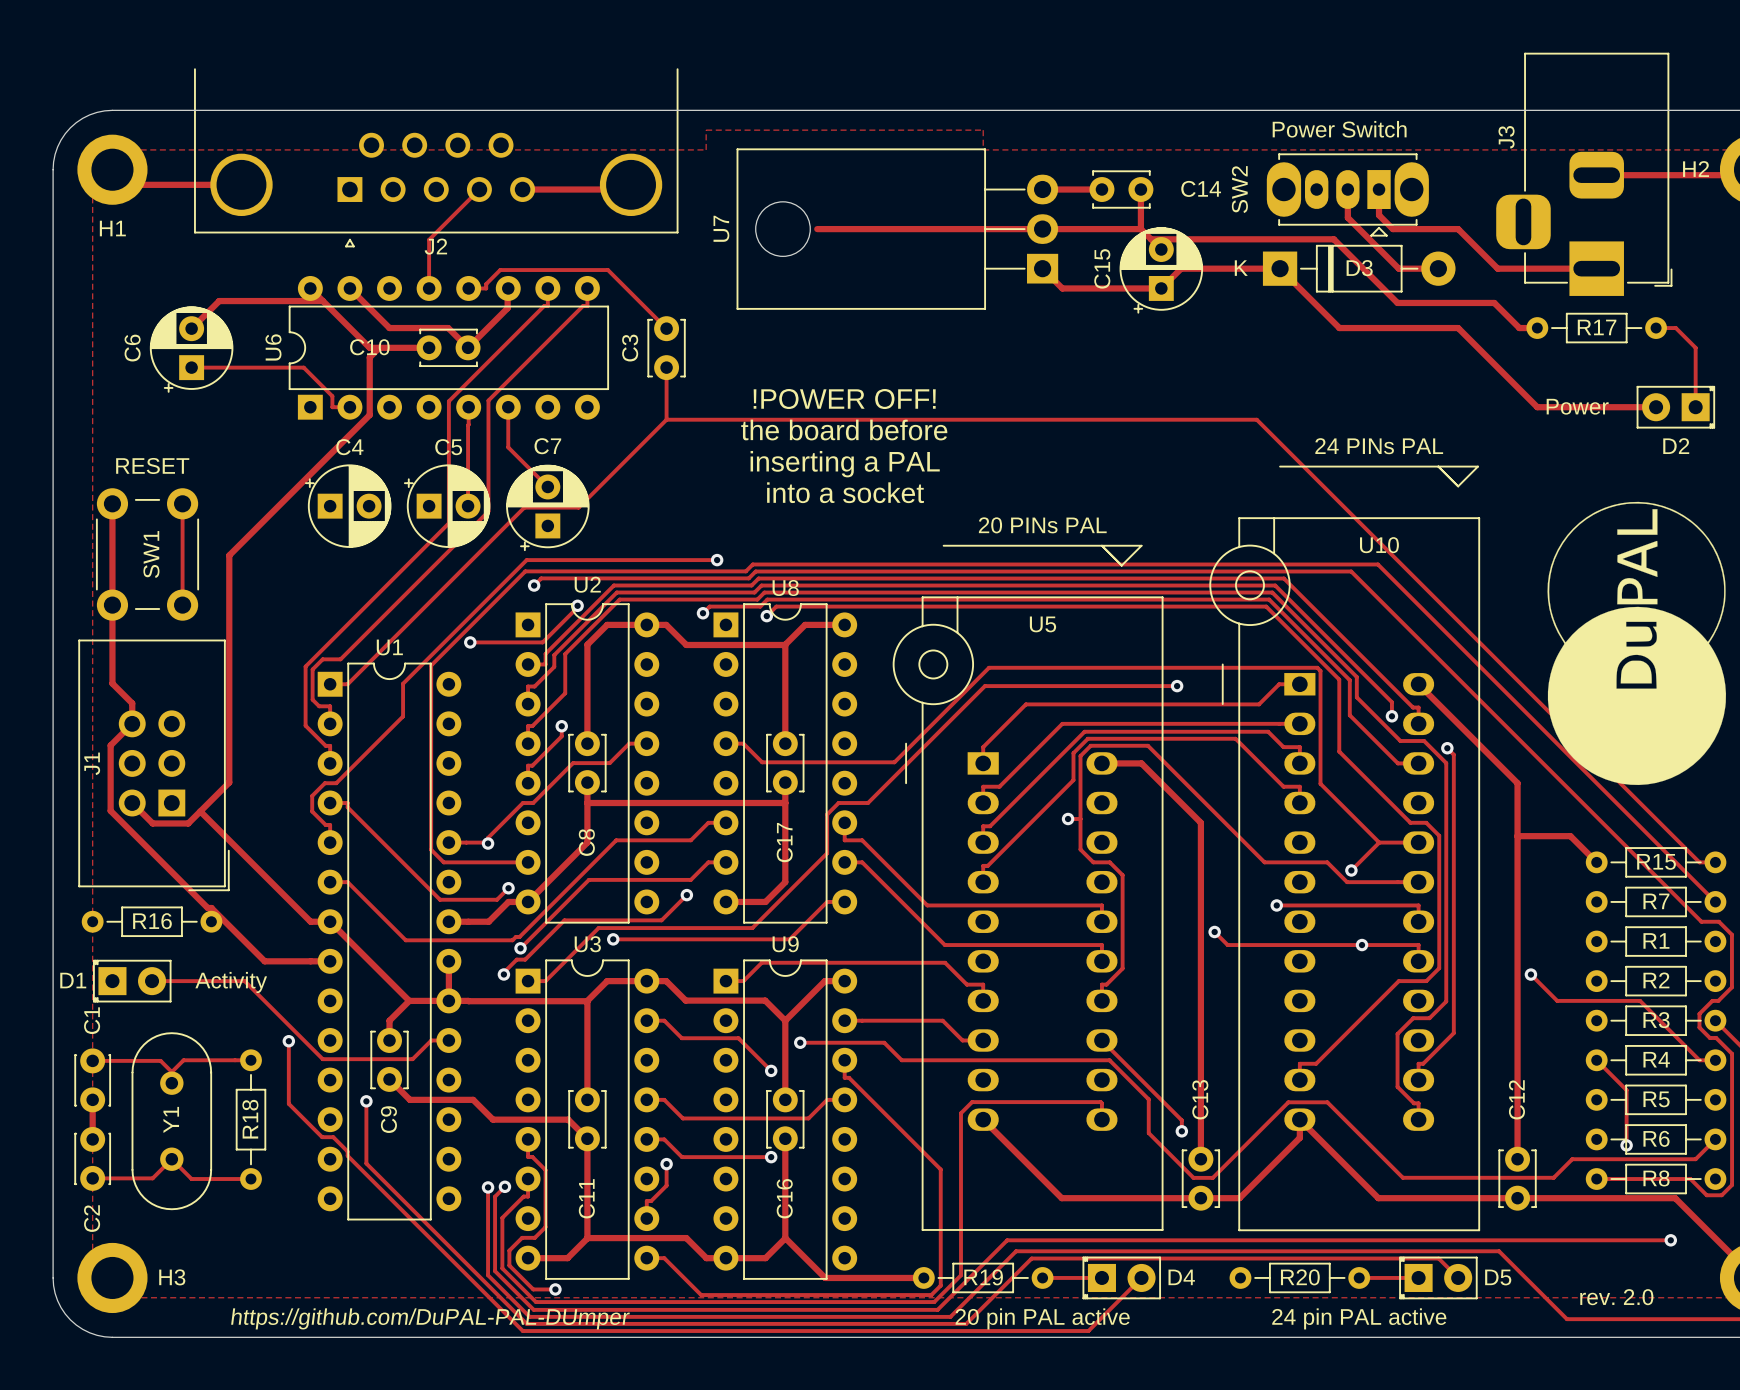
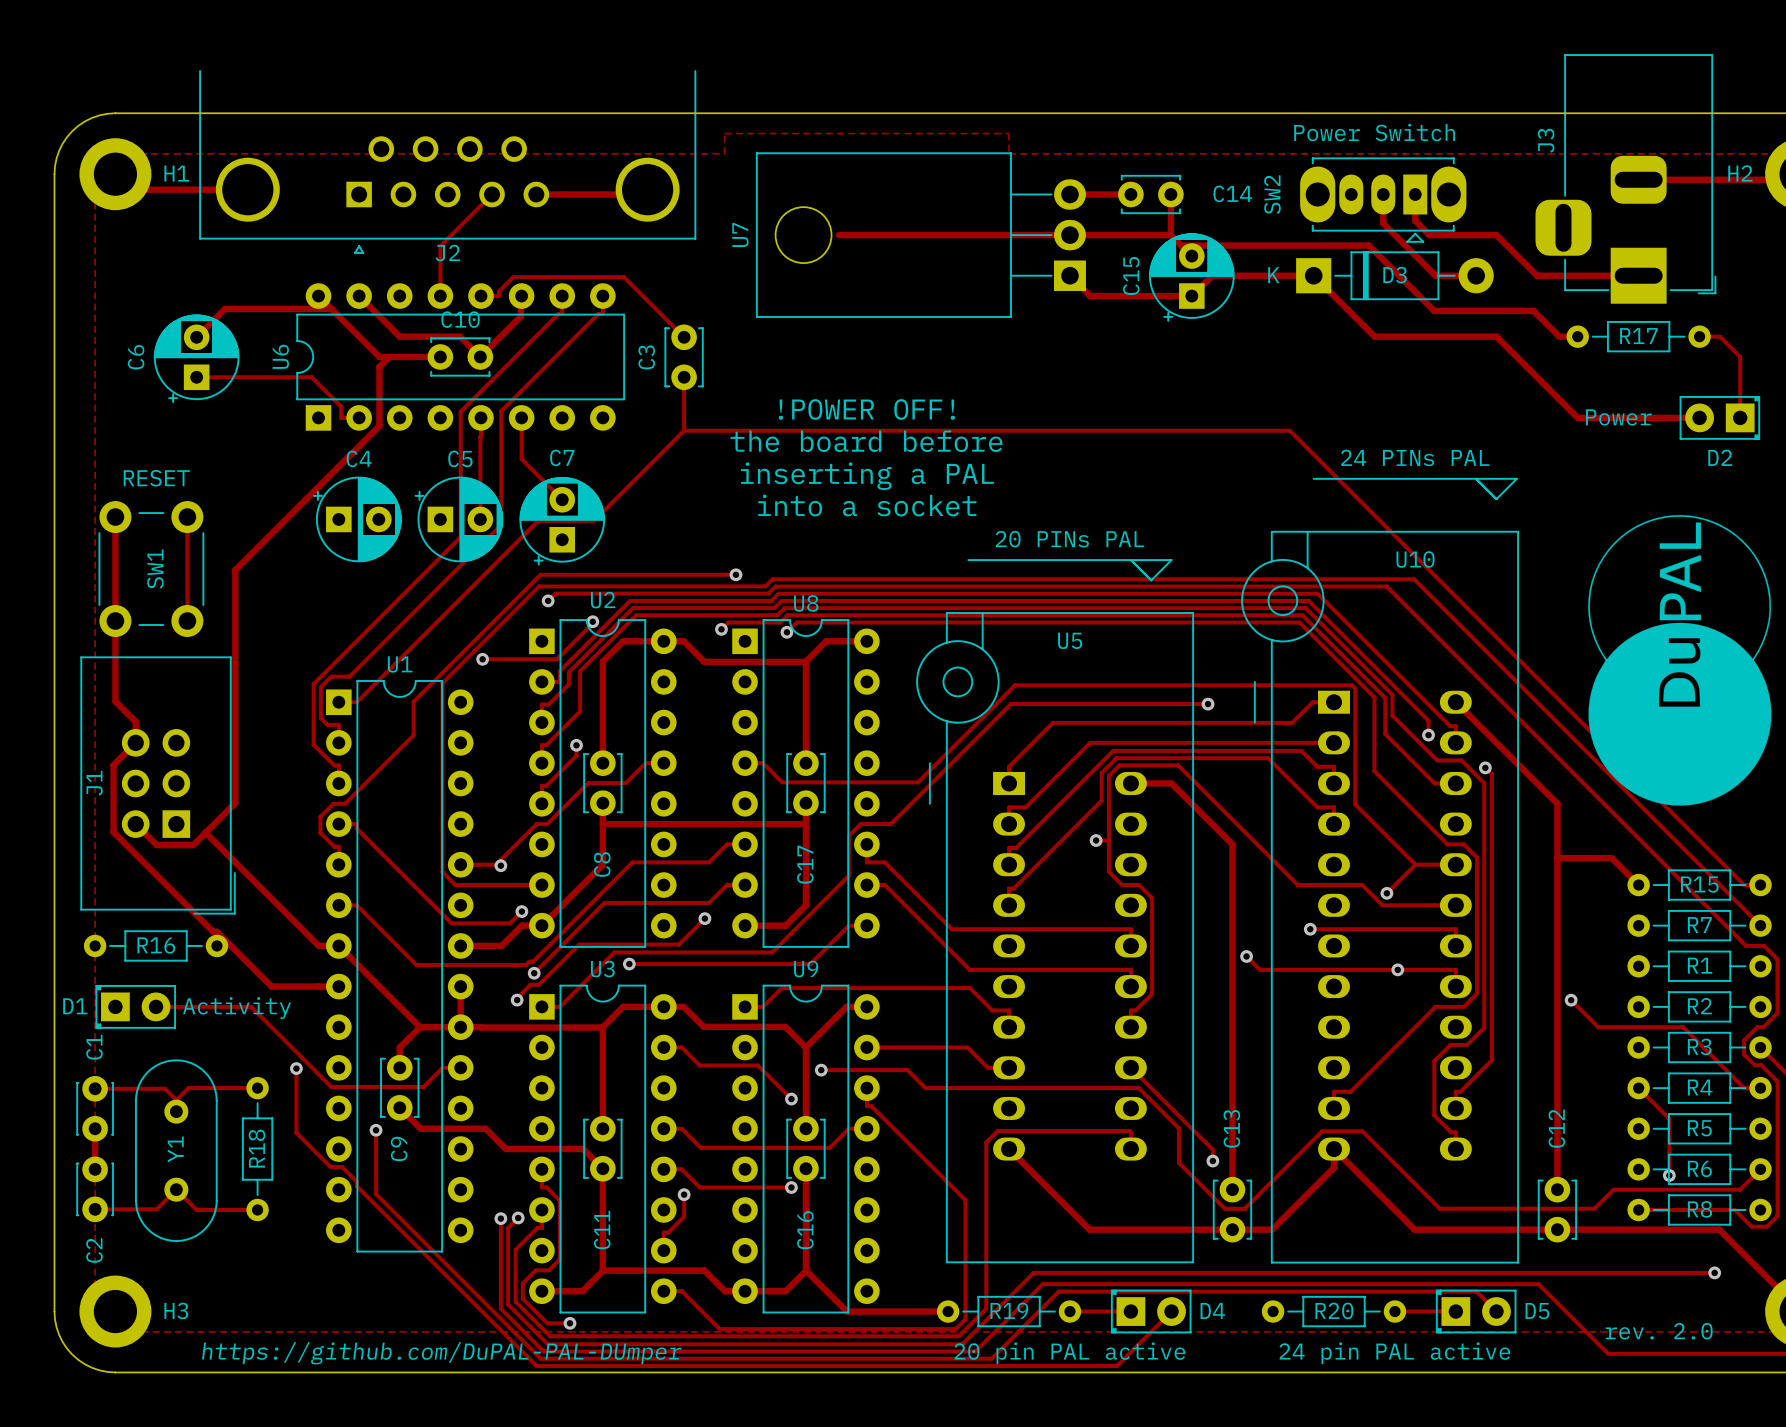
H1 name position: H1 (112, 228) -> H1 (176, 173)
C10 name position: C10 (369, 347) -> C10 (460, 319)

